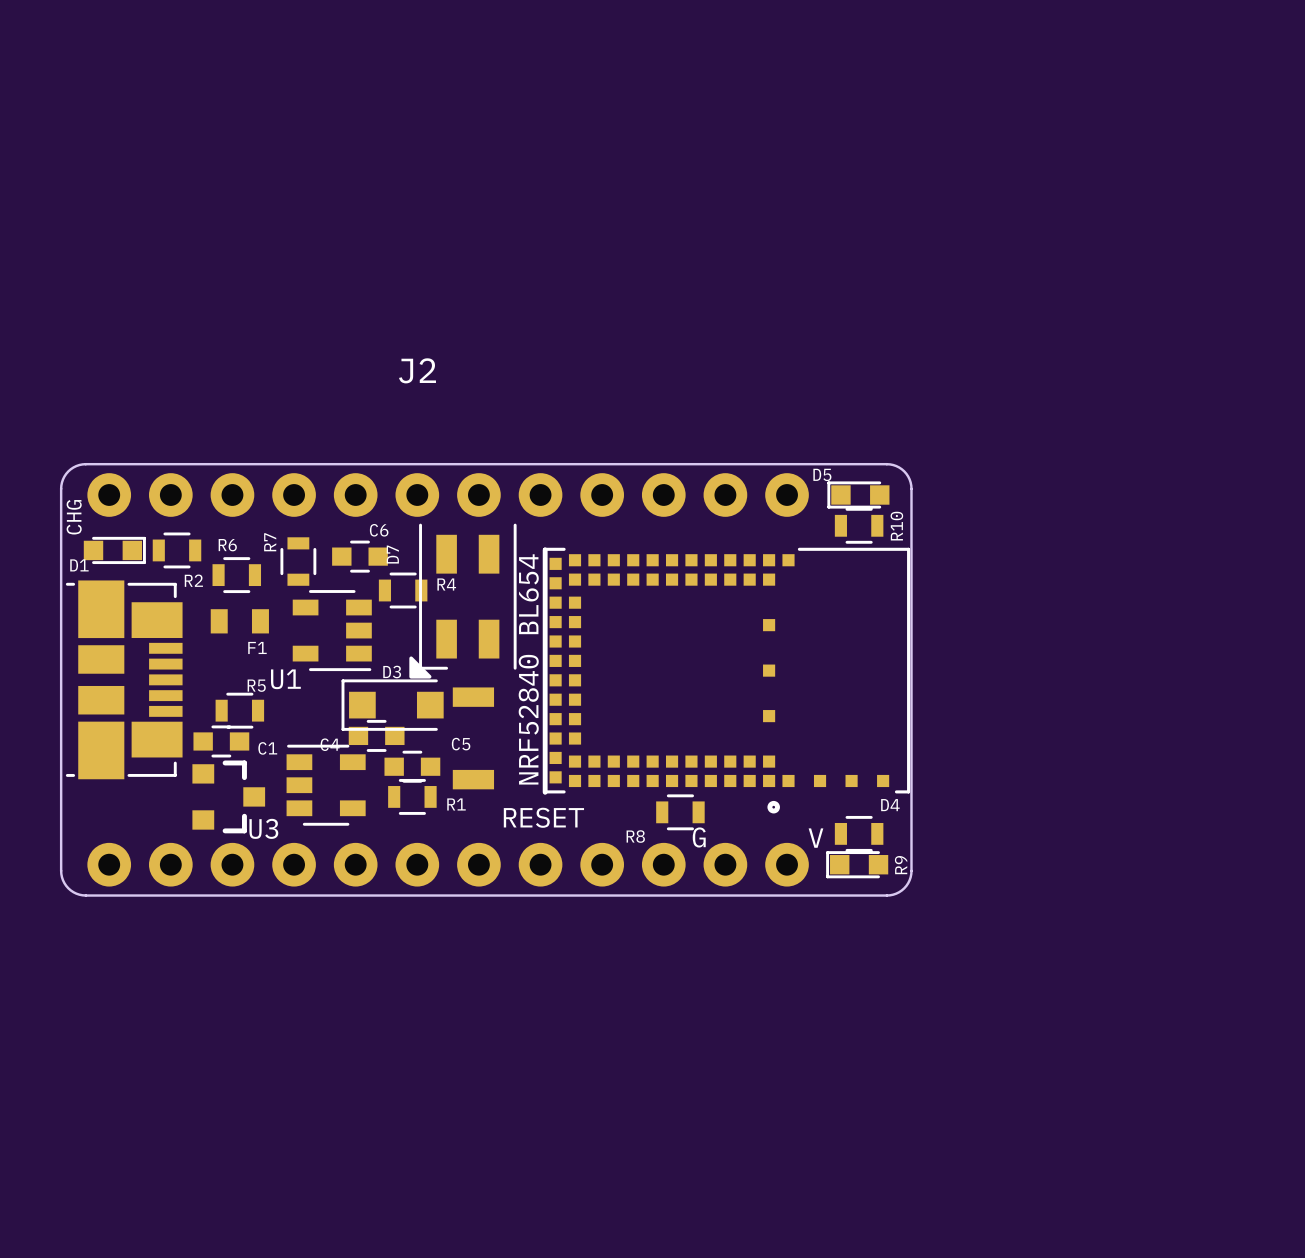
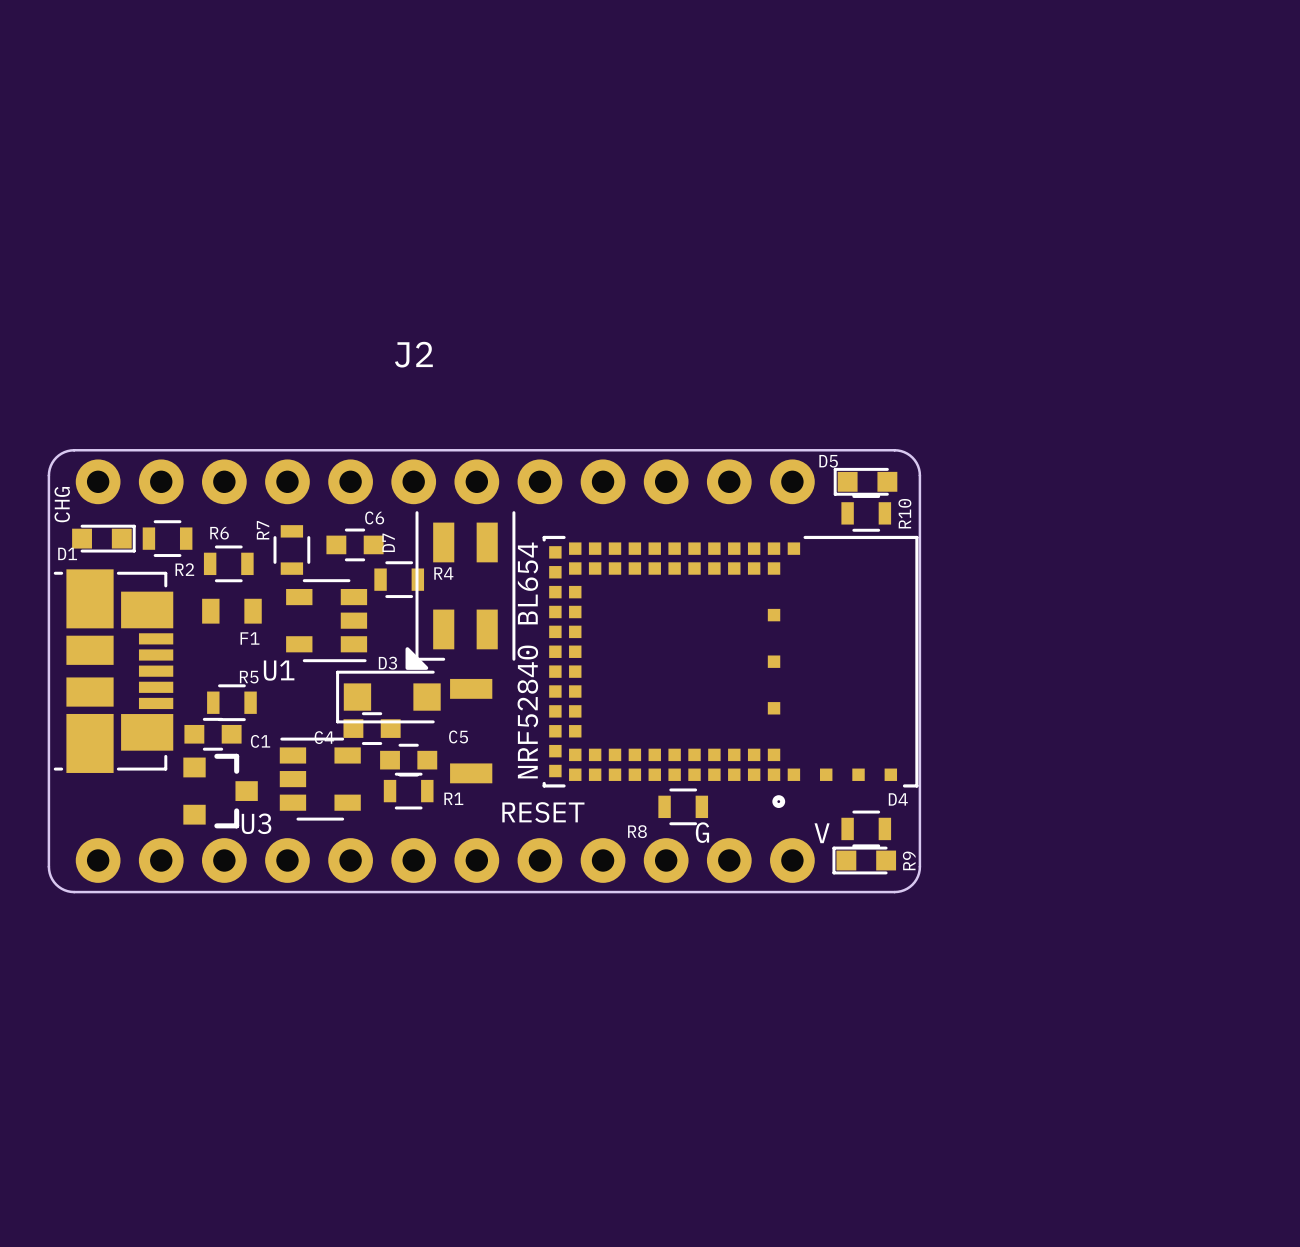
line: (545, 549) (545, 792) -> none

